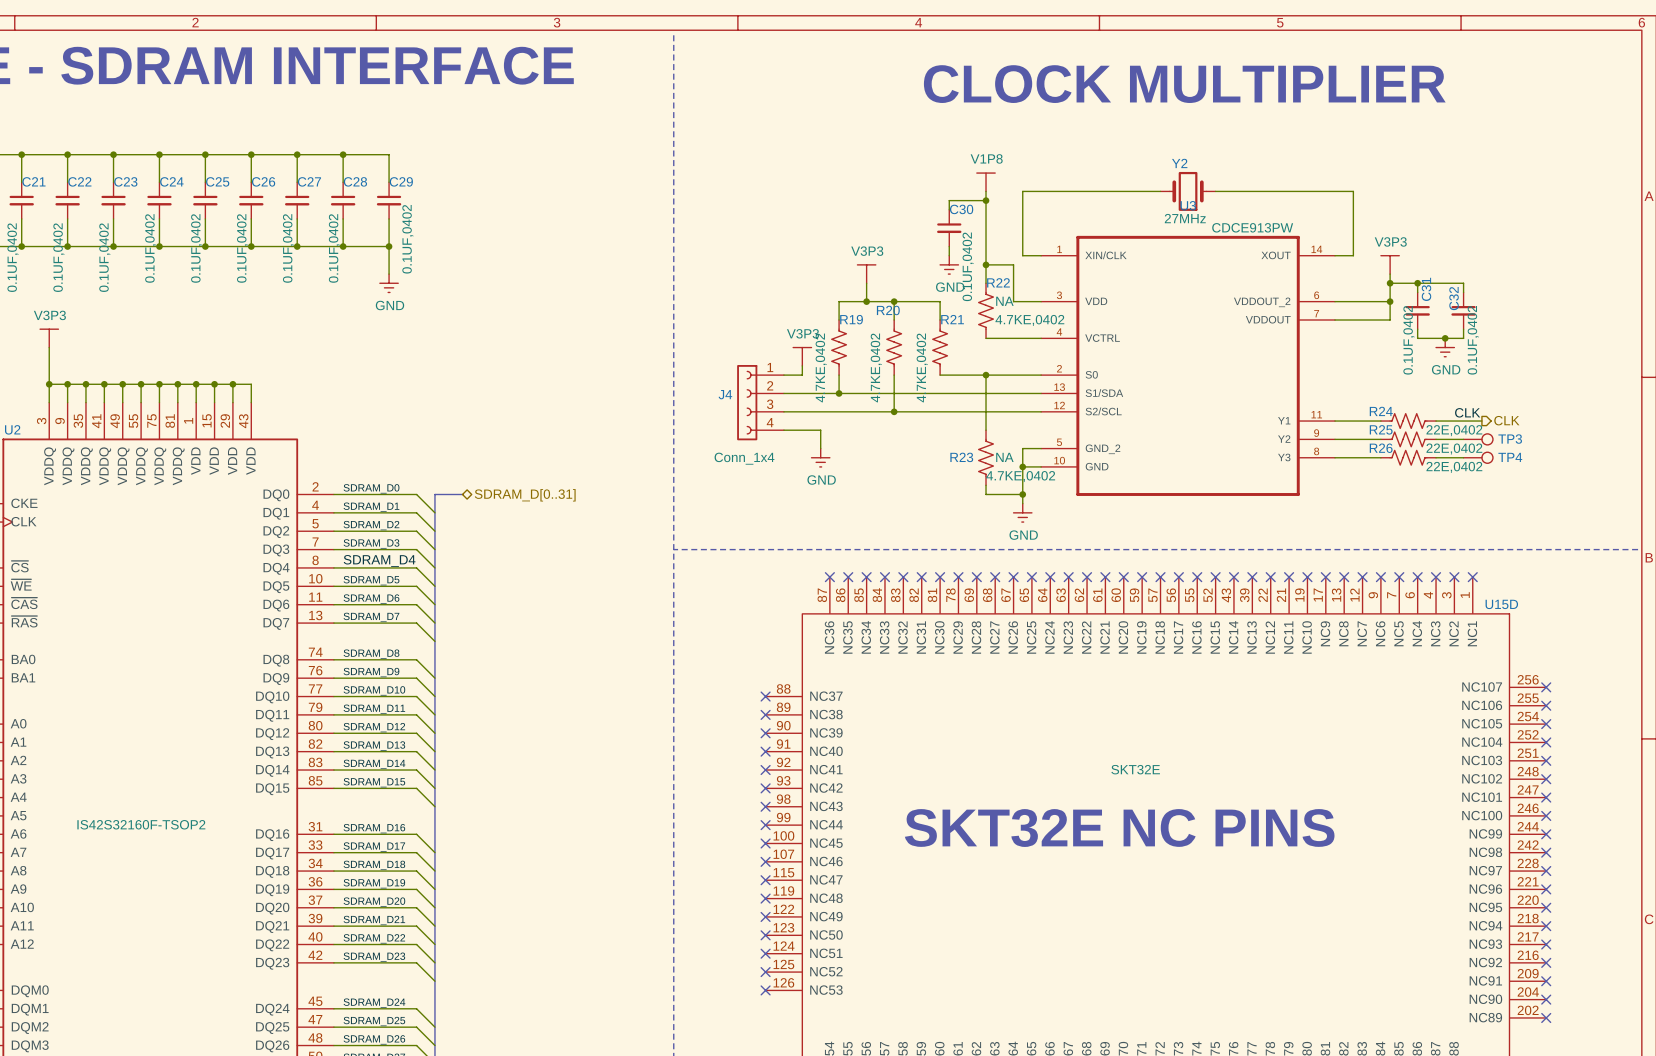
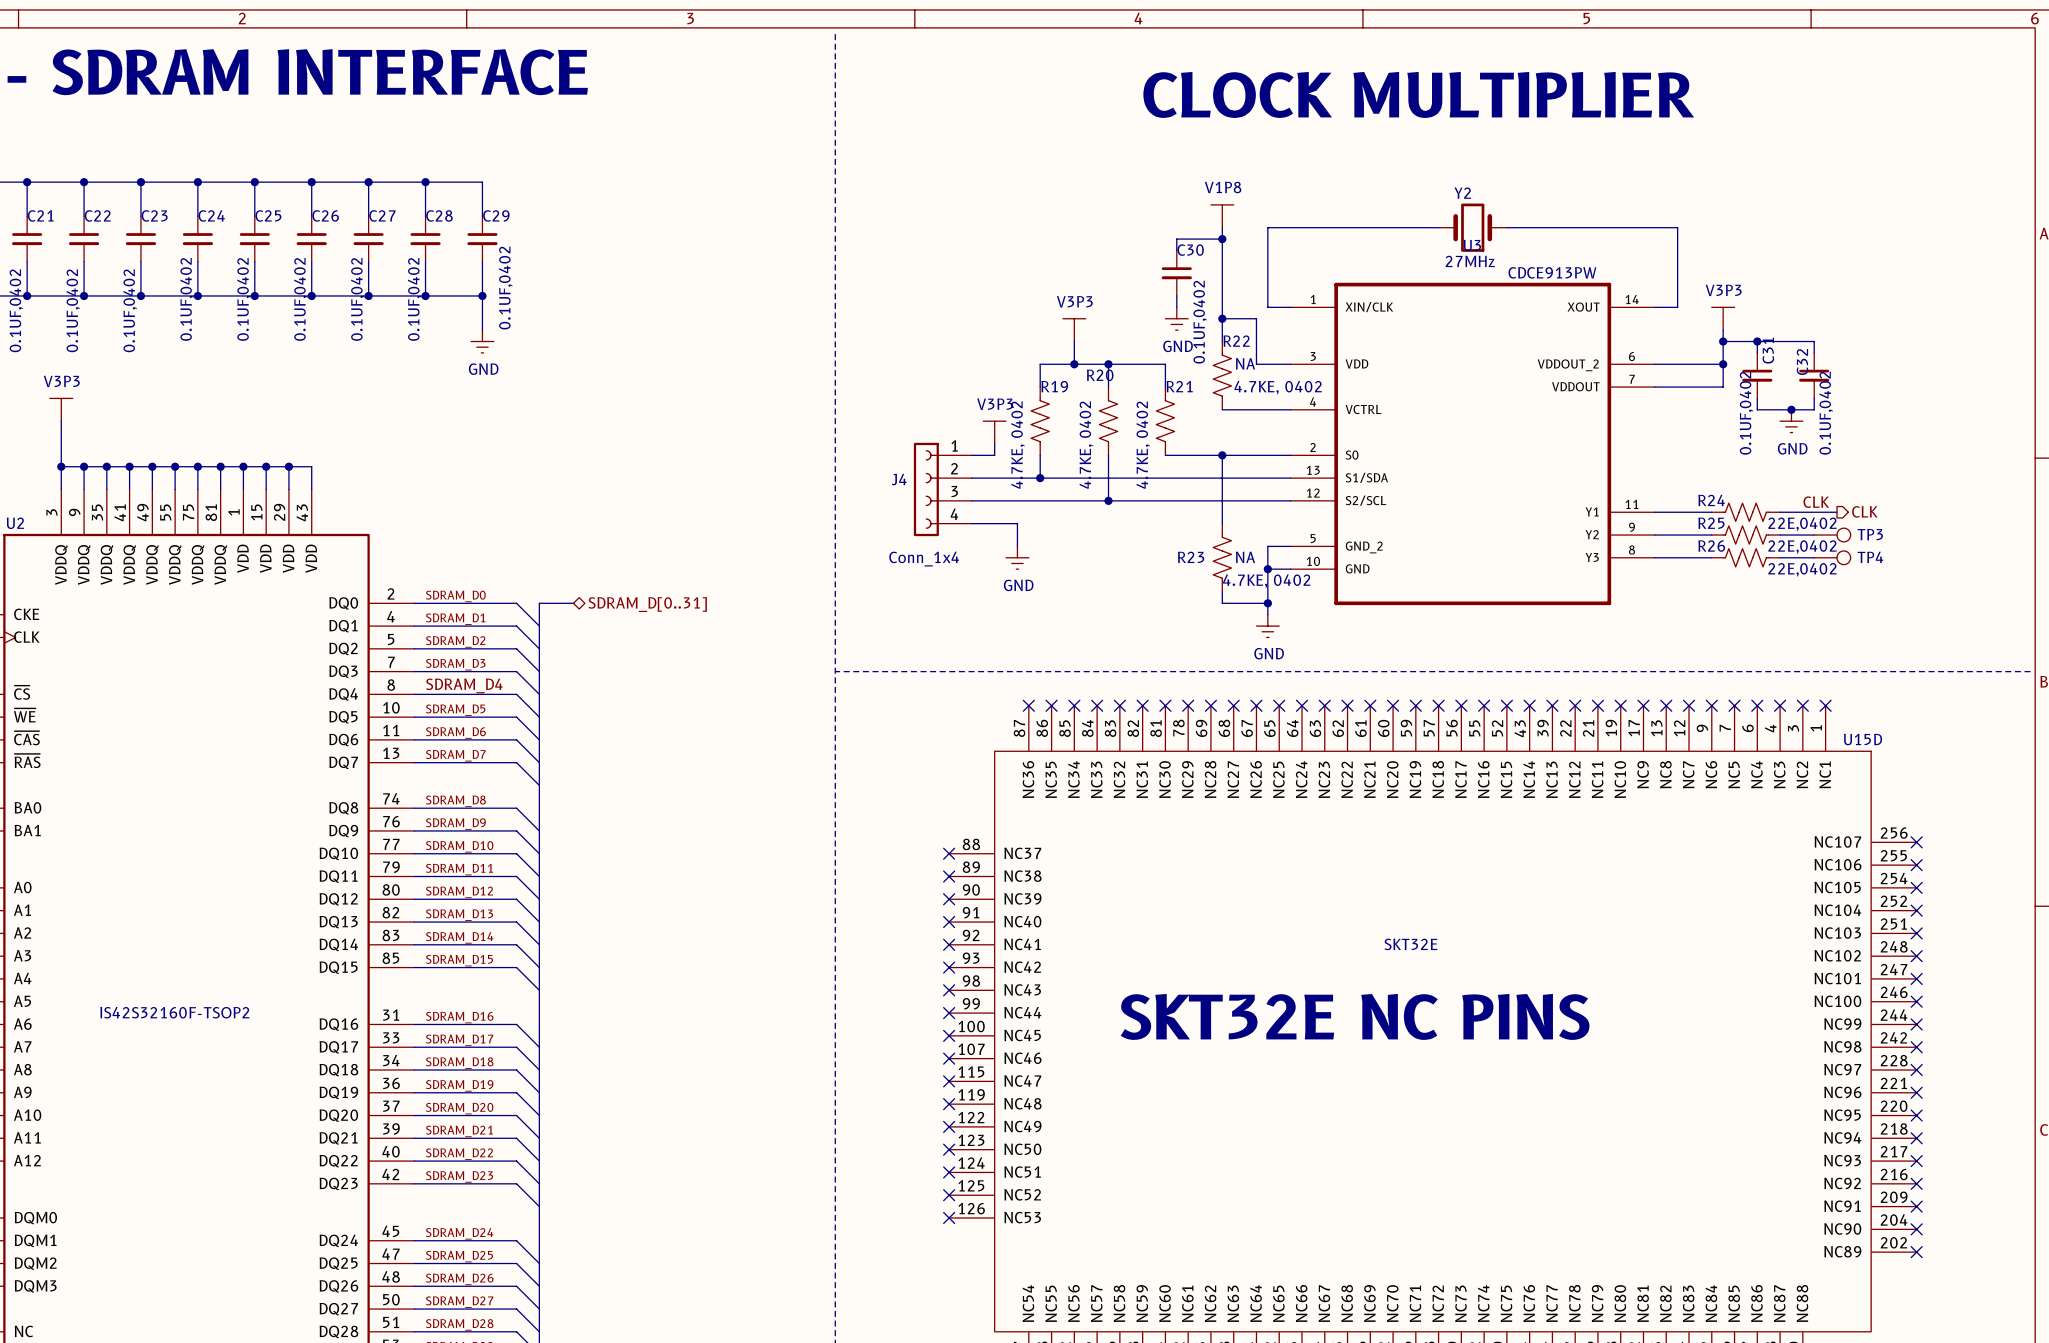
R22 value: 4.7KE,0402 (1029, 320) -> 4.7KE, 0402 (1278, 387)
R19 value: 4.7KE,0402 (821, 367) -> 4.7KE, 0402 (1018, 445)
R20 value: 4.7KE,0402 (876, 367) -> 4.7KE, 0402 (1086, 445)
R21 value: 4.7KE,0402 (922, 367) -> 4.7KE, 0402 (1143, 445)
R23 value: 4.7KE,0402 (1020, 476) -> 4.7KE, 0402 (1266, 581)

